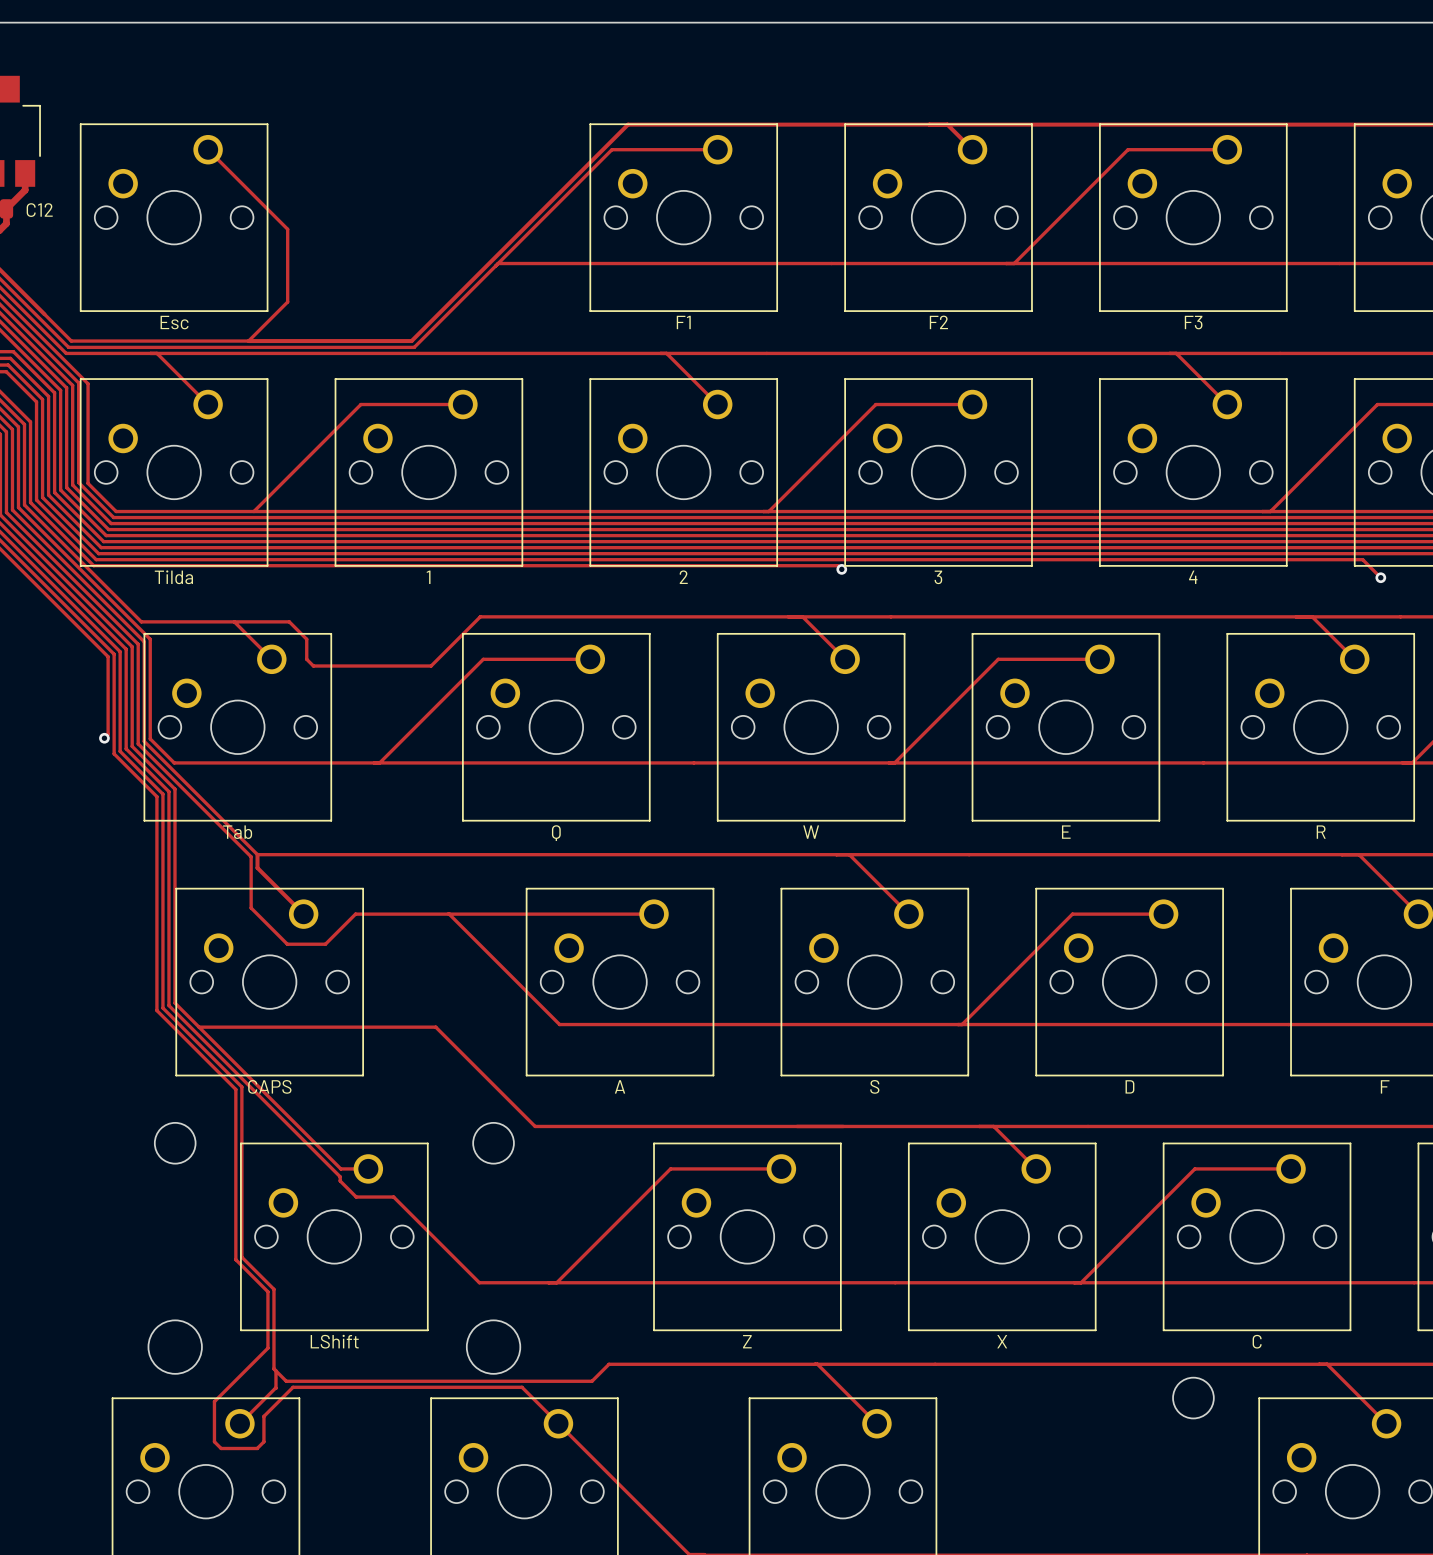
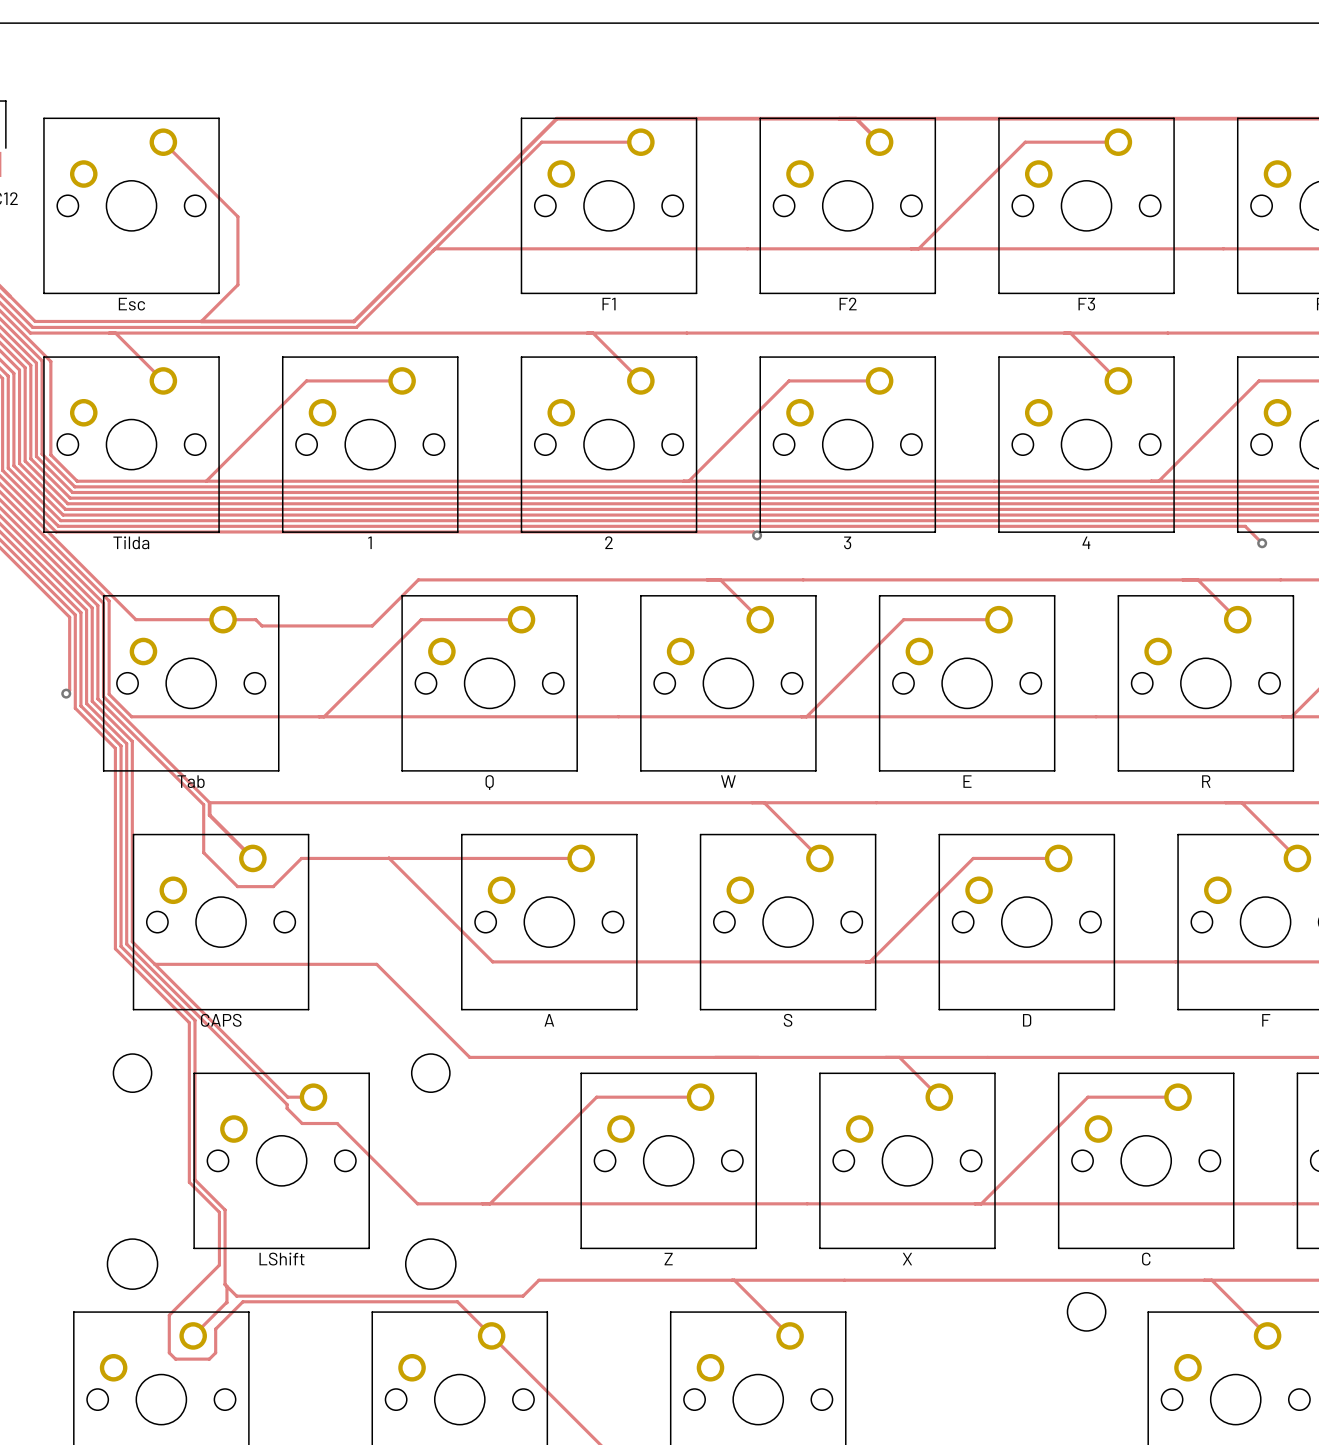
track: (141, 621) (289, 621) (306, 639) (306, 659) -> (100, 584) (135, 619) (255, 619)
track: (234, 622) (271, 659) -> none

